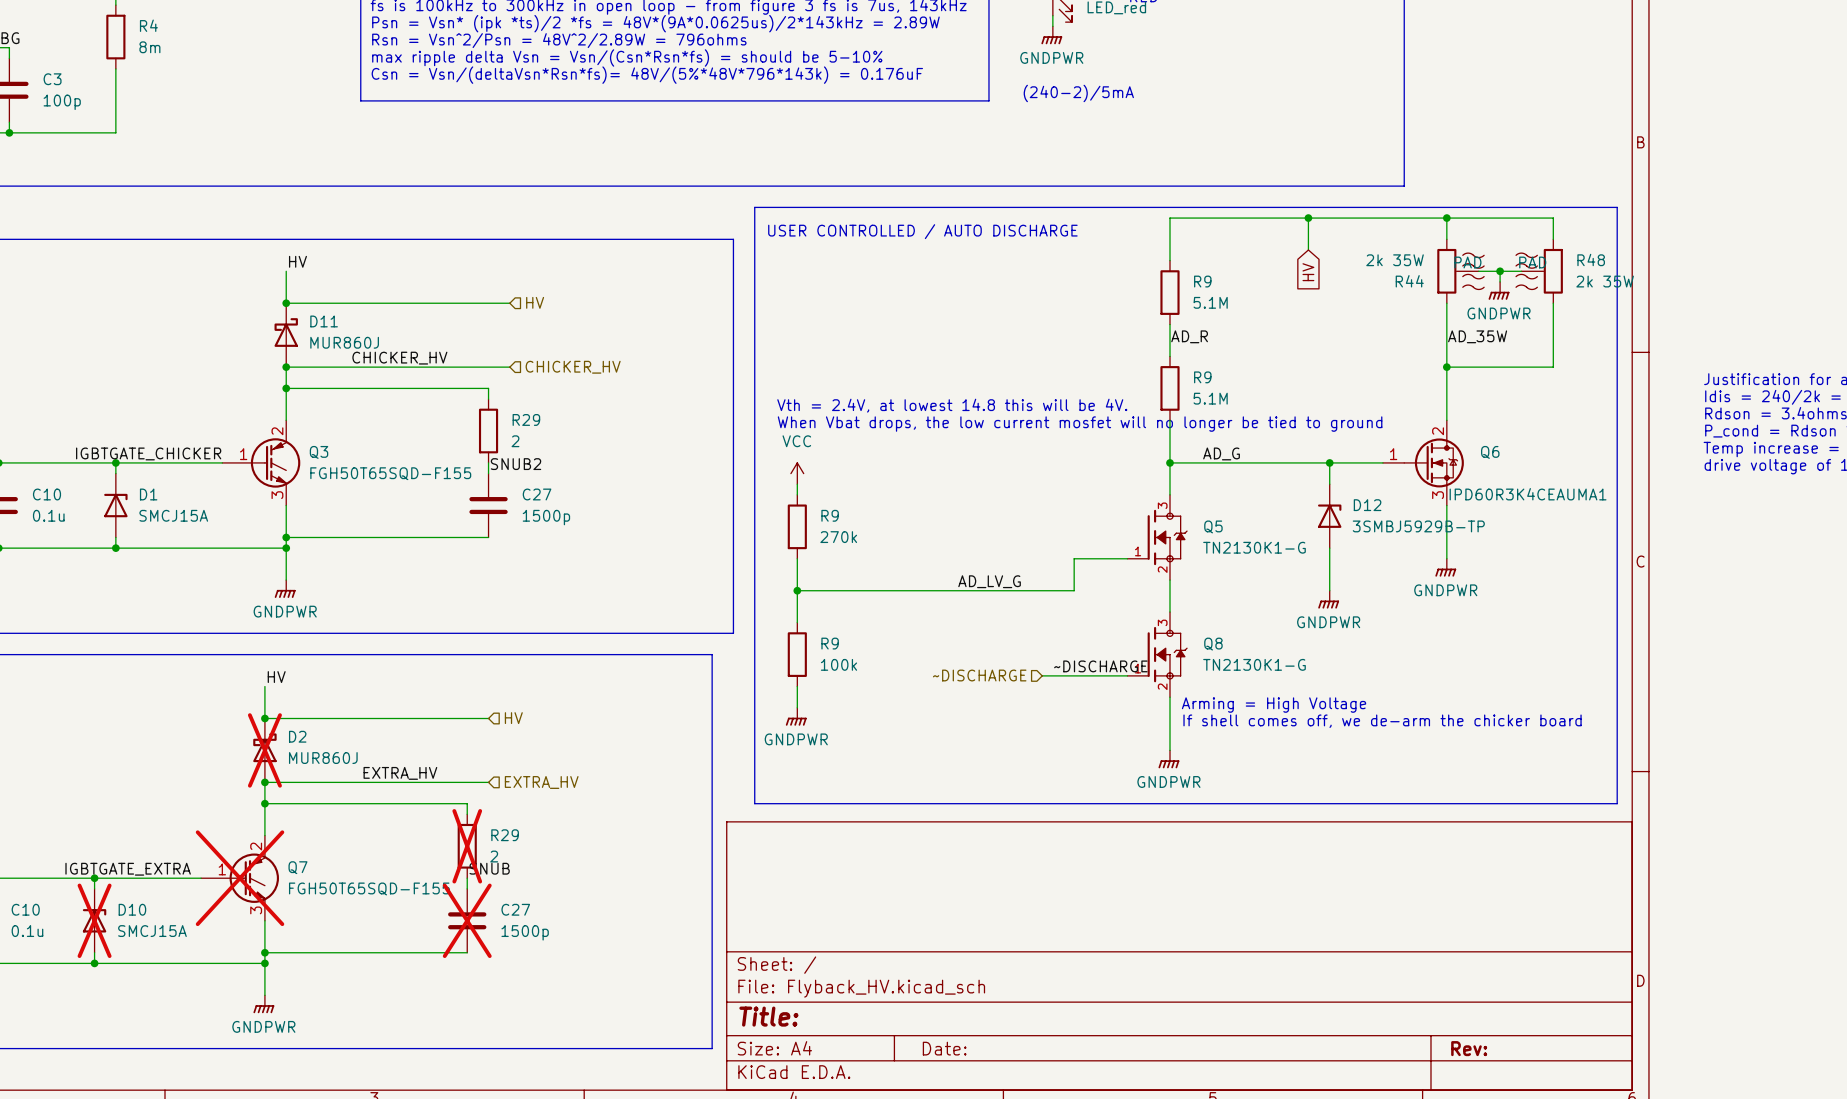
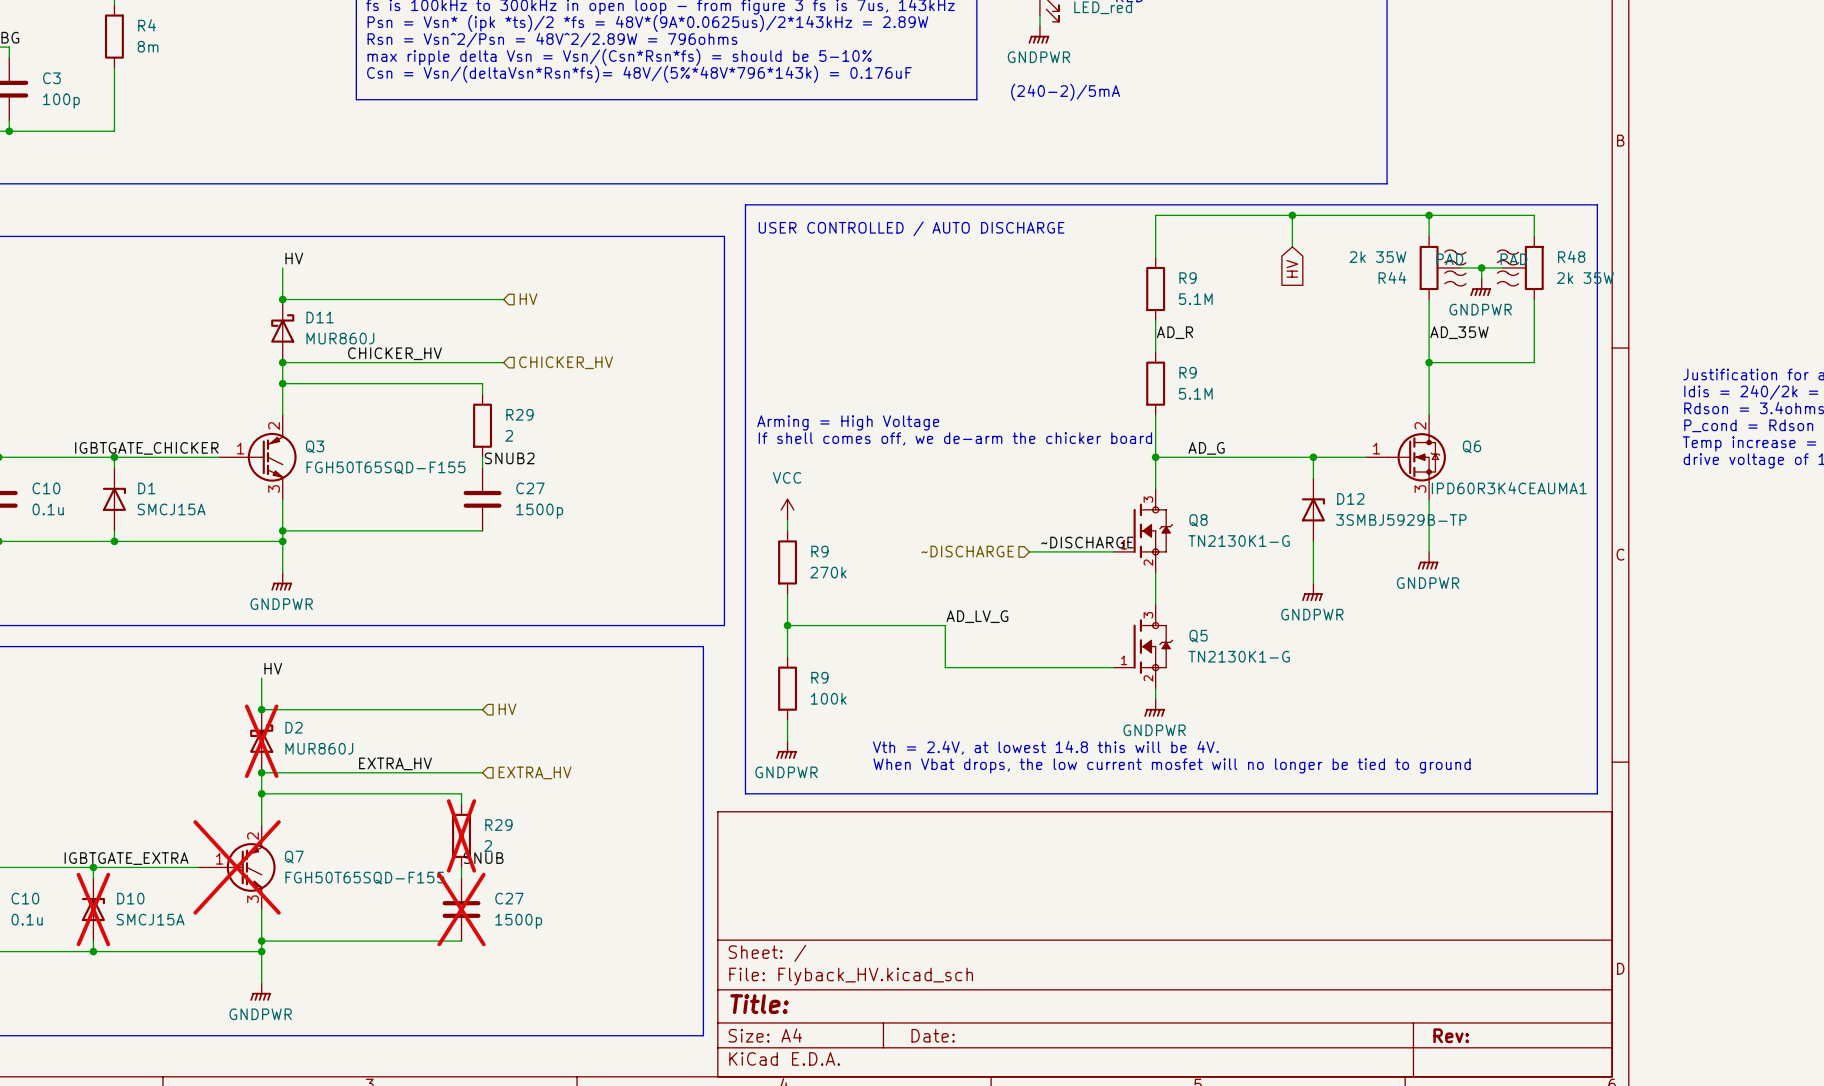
text: Vth = 2.4V, at lowest 14.8 this will be 4V. (952, 405) -> none
text: When Vbat drops, the low current mosfet will no longer be tied to ground (1080, 424) -> none
text: none -> Arming = High Voltage (848, 422)
text: none -> If shell comes off, we de-arm the chicker board (955, 438)
power symbol position: VCC (797, 473) -> VCC (787, 509)
wire: (797, 484) (797, 494) -> (787, 520) (787, 530)
R9 position: (797, 526) -> (787, 562)
Q5 name: Q5 (1213, 526) -> Q8 (1198, 520)
wire: (797, 558) (797, 601) -> (787, 615) (787, 657)
wire: (1074, 558) (1074, 590) (797, 590) -> (1061, 551) (1029, 551)
label position: AD_LV_G (989, 581) -> AD_LV_G (977, 616)
junction position: (797, 590) -> (787, 625)
wire: none -> (787, 625) (945, 625) (945, 667) (1029, 667)
Q8 name: Q8 (1213, 644) -> Q5 (1198, 636)
R9 position: (797, 654) -> (787, 688)
label position: ~DISCHARGE (1100, 666) -> ~DISCHARGE (1087, 542)
hierarchical label position: ~DISCHARGE (979, 675) -> ~DISCHARGE (967, 551)
wire: (797, 686) (797, 707) -> (787, 720) (787, 741)
text: Arming = High Voltage (1274, 705) -> none
wire: (1169, 707) (1169, 750) -> none
power symbol position: GNDPWR (796, 716) -> GNDPWR (786, 750)
text: If shell comes off, we de-arm the chicker board (1382, 721) -> none
text: none -> Vth = 2.4V, at lowest 14.8 this will be 4V. (1045, 747)
power symbol position: GNDPWR (1168, 759) -> GNDPWR (1154, 708)
text: none -> When Vbat drops, the low current mosfet will no longer be tied to ground (1172, 765)

